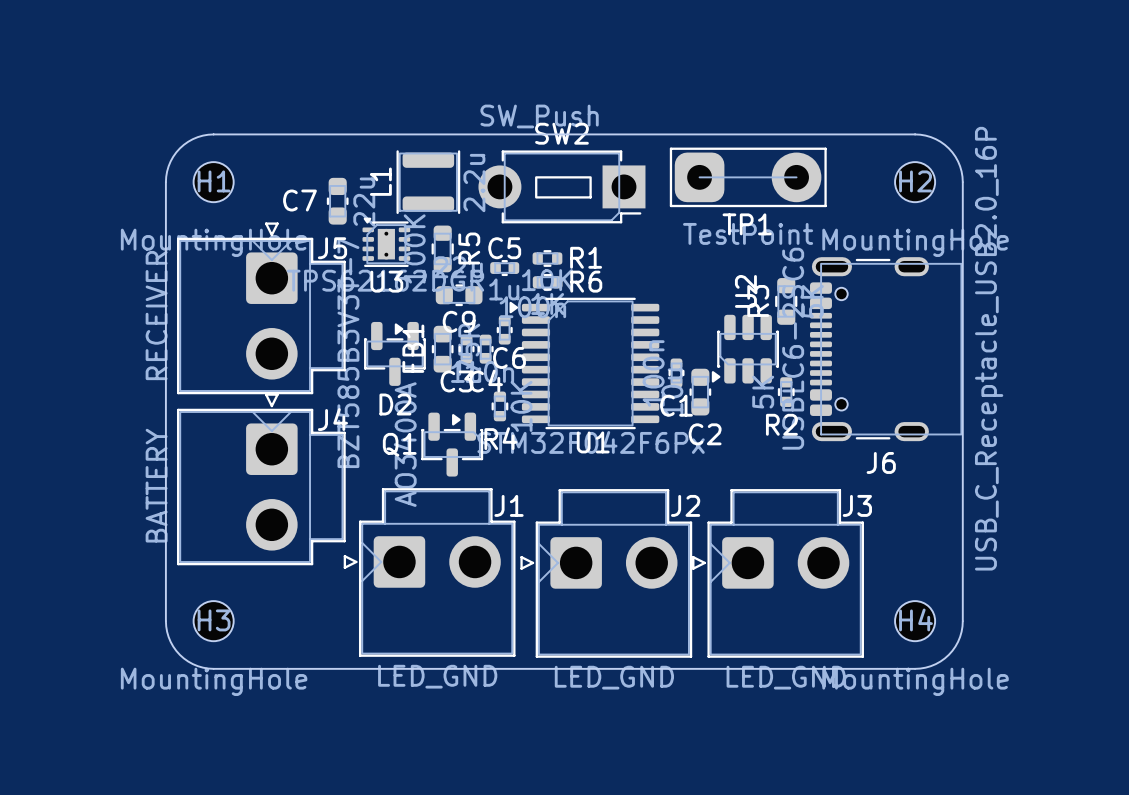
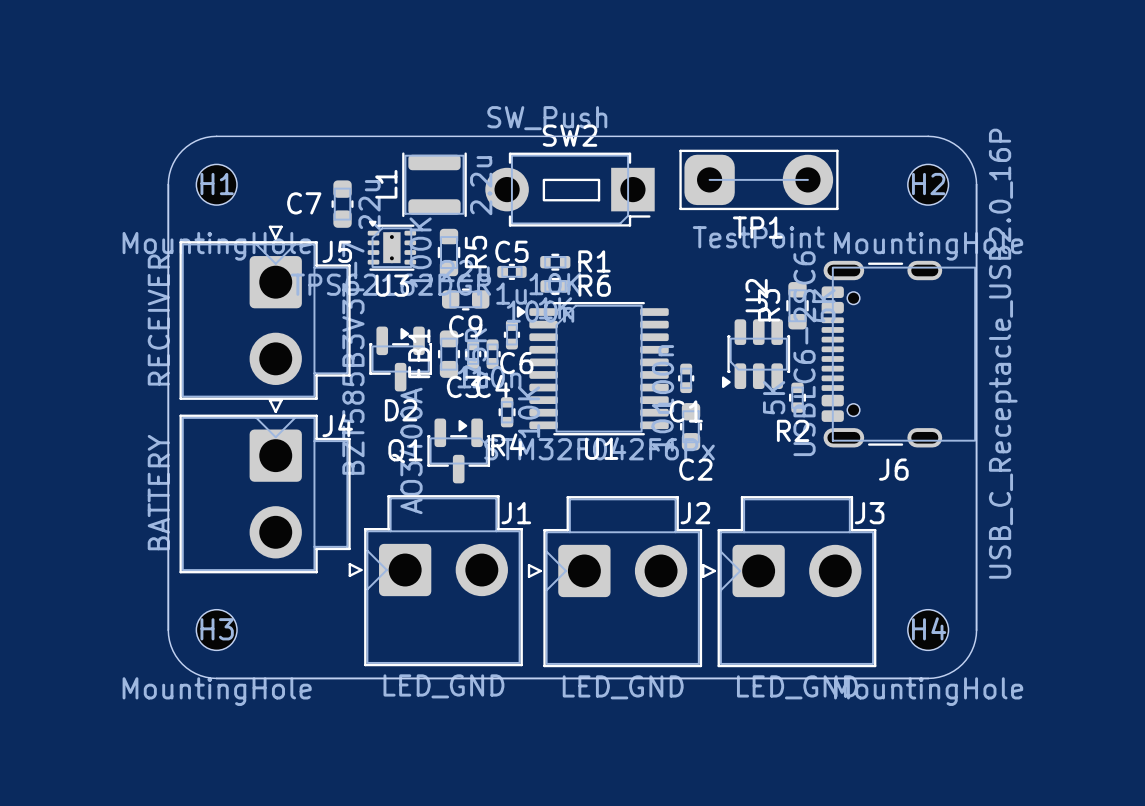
C2 position: (700, 392) -> (691, 426)

